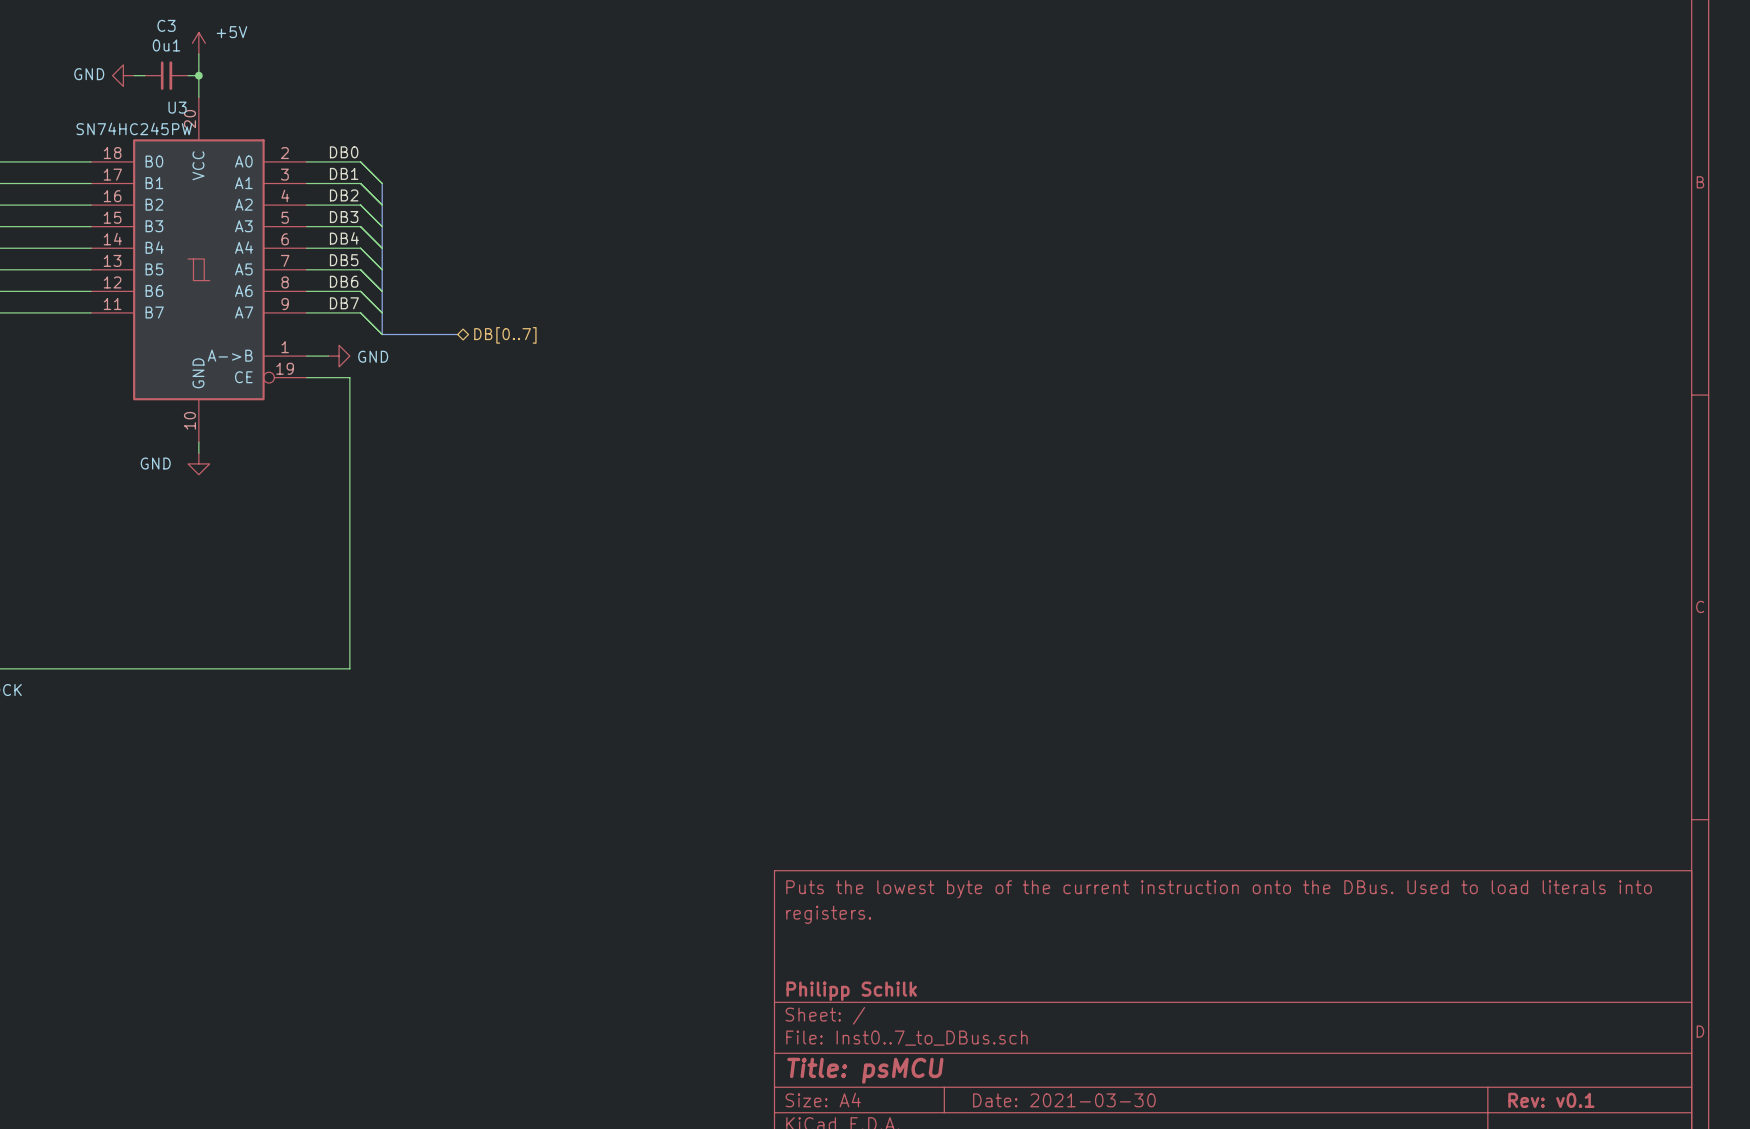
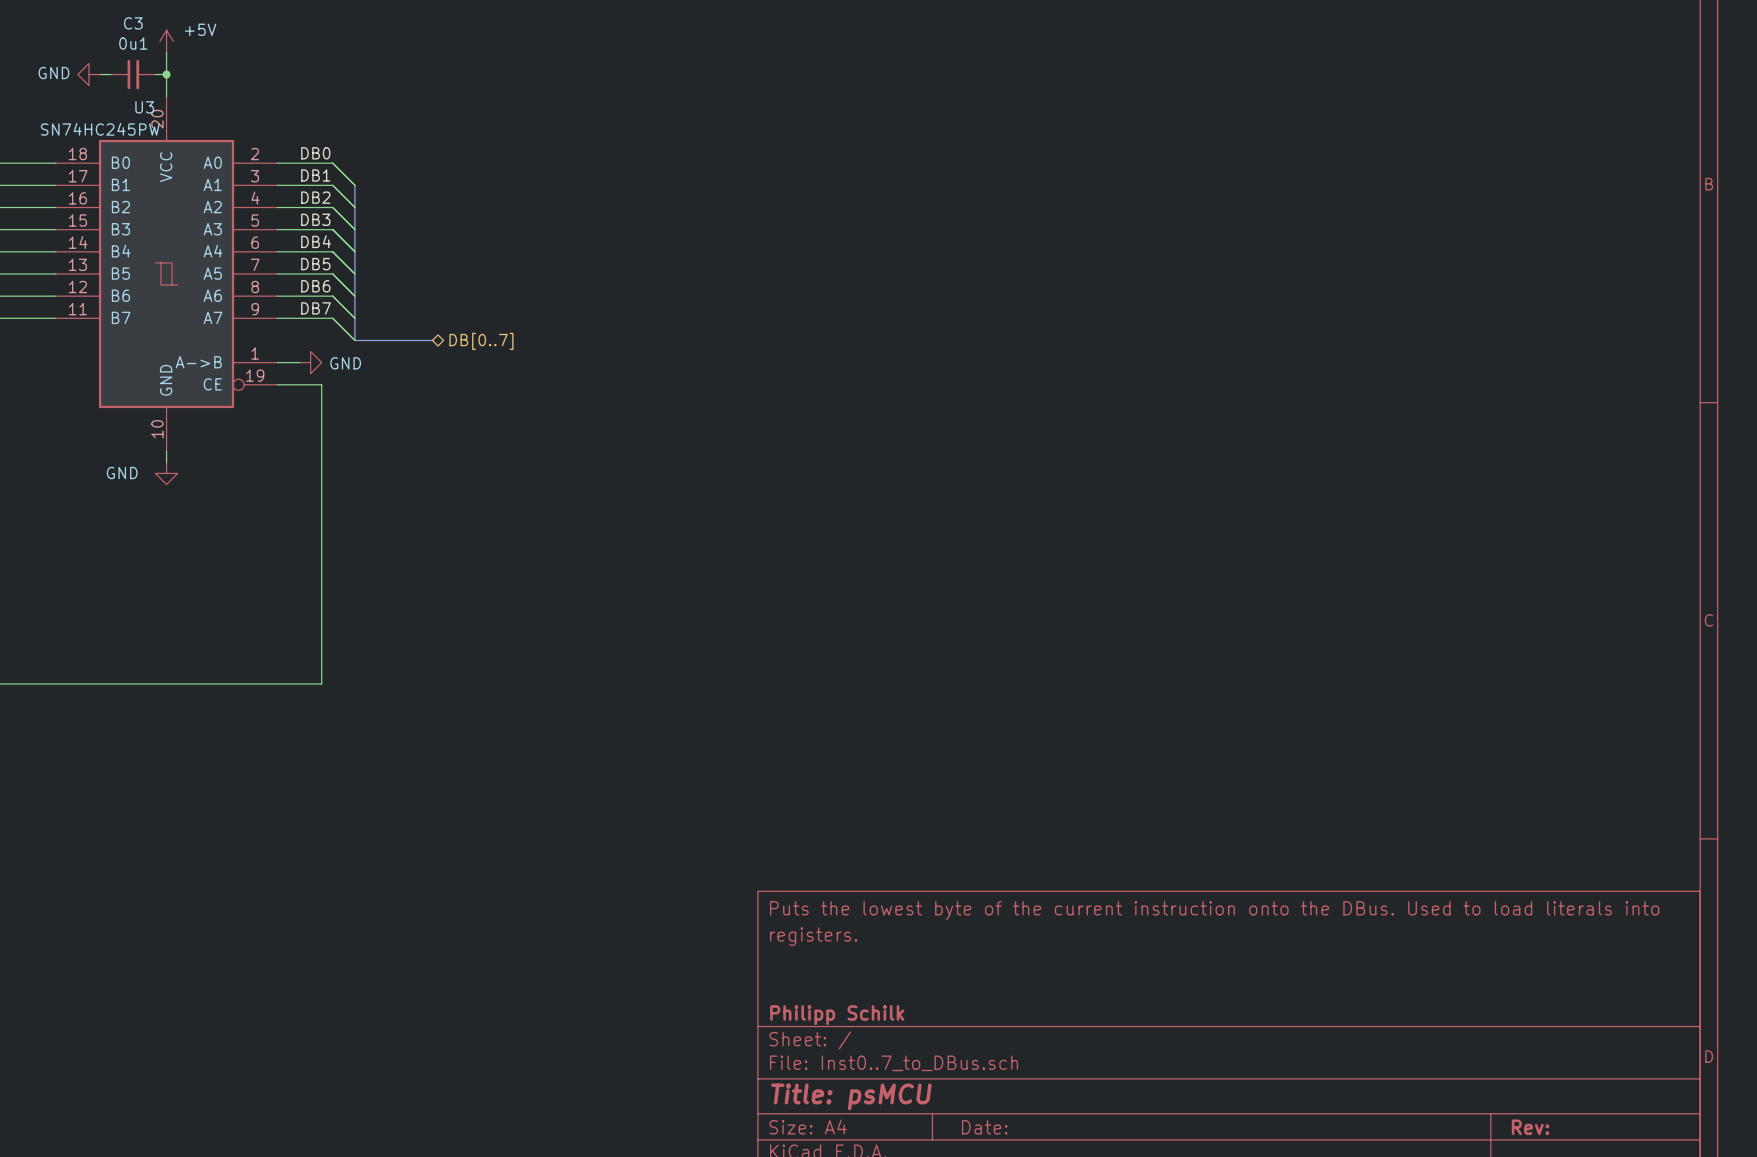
title block: Date: 2021-03-30 (1064, 1100) -> Date: (984, 1127)
title block: Rev: v0.1 (1551, 1100) -> Rev: (1530, 1127)

